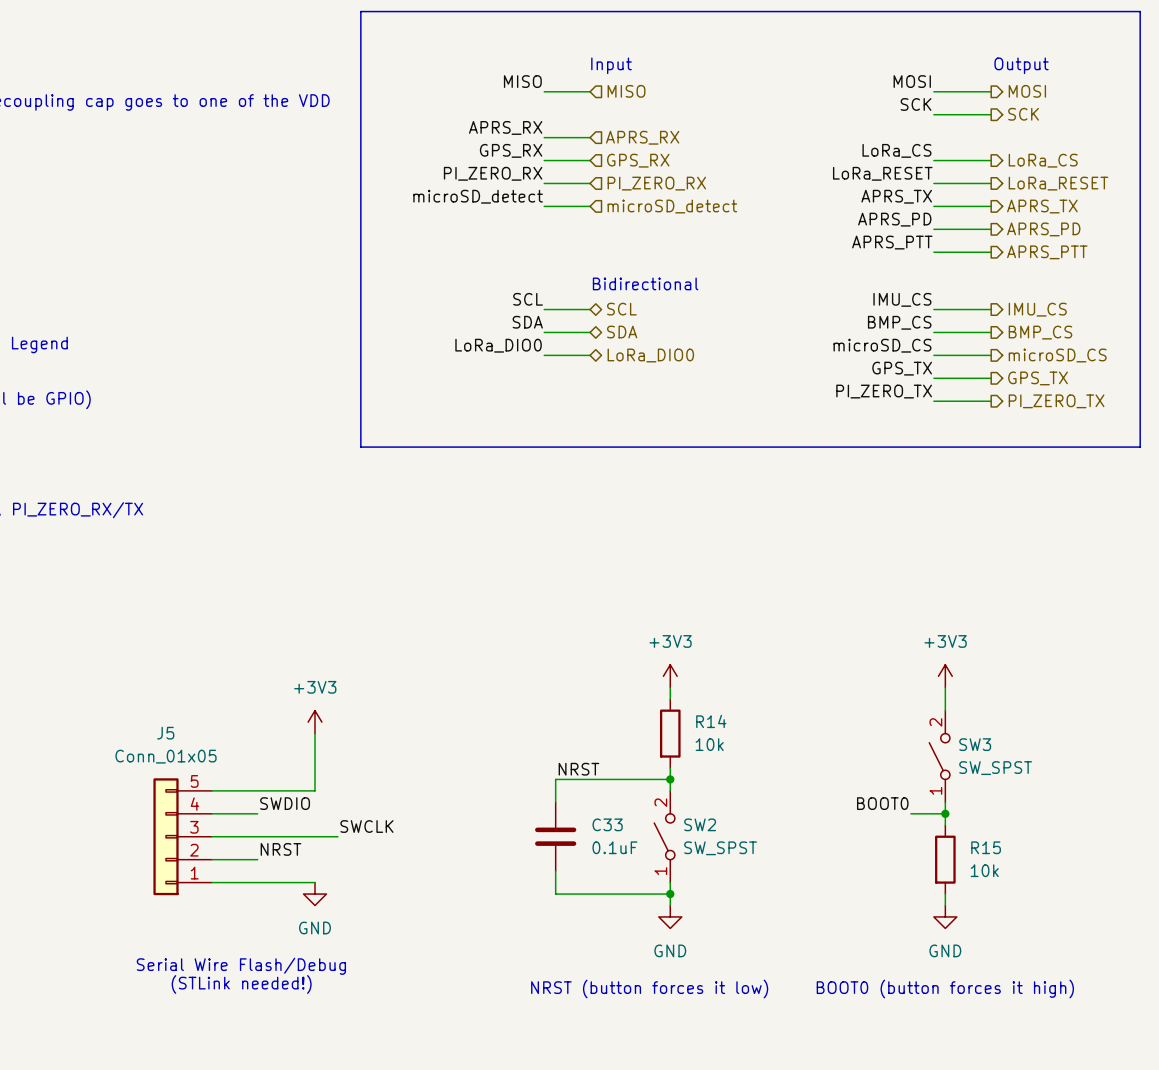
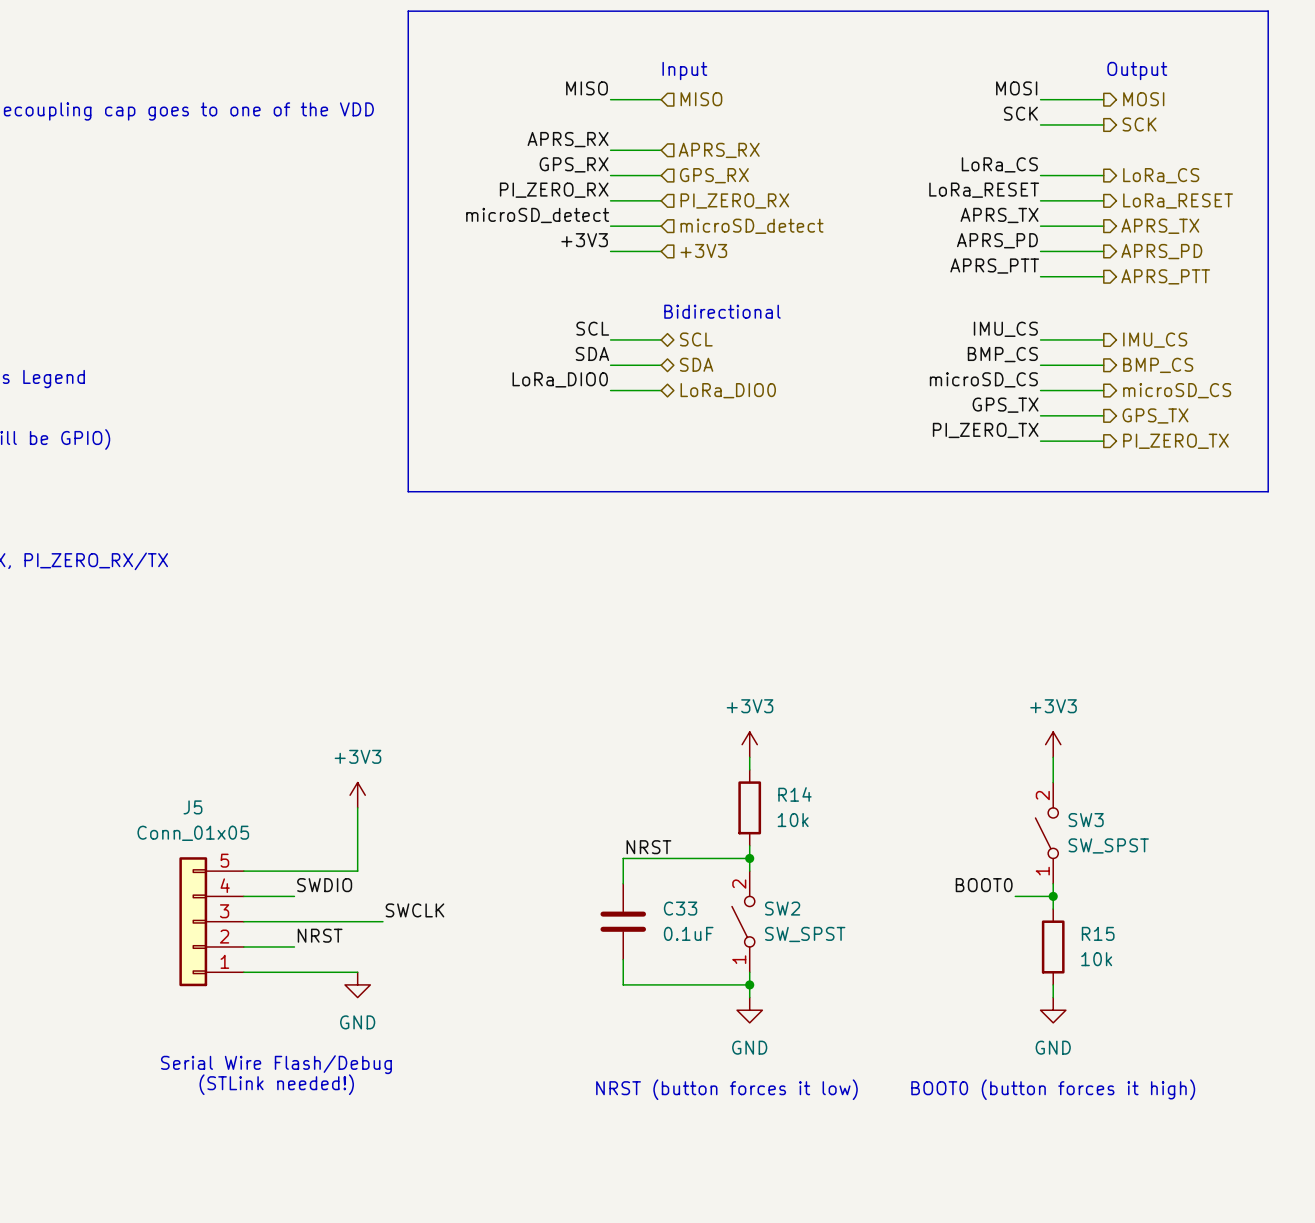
label: none -> +3V3 (584, 240)
hierarchical label: none -> +3V3 (703, 250)
wire: none -> (610, 251) (661, 251)

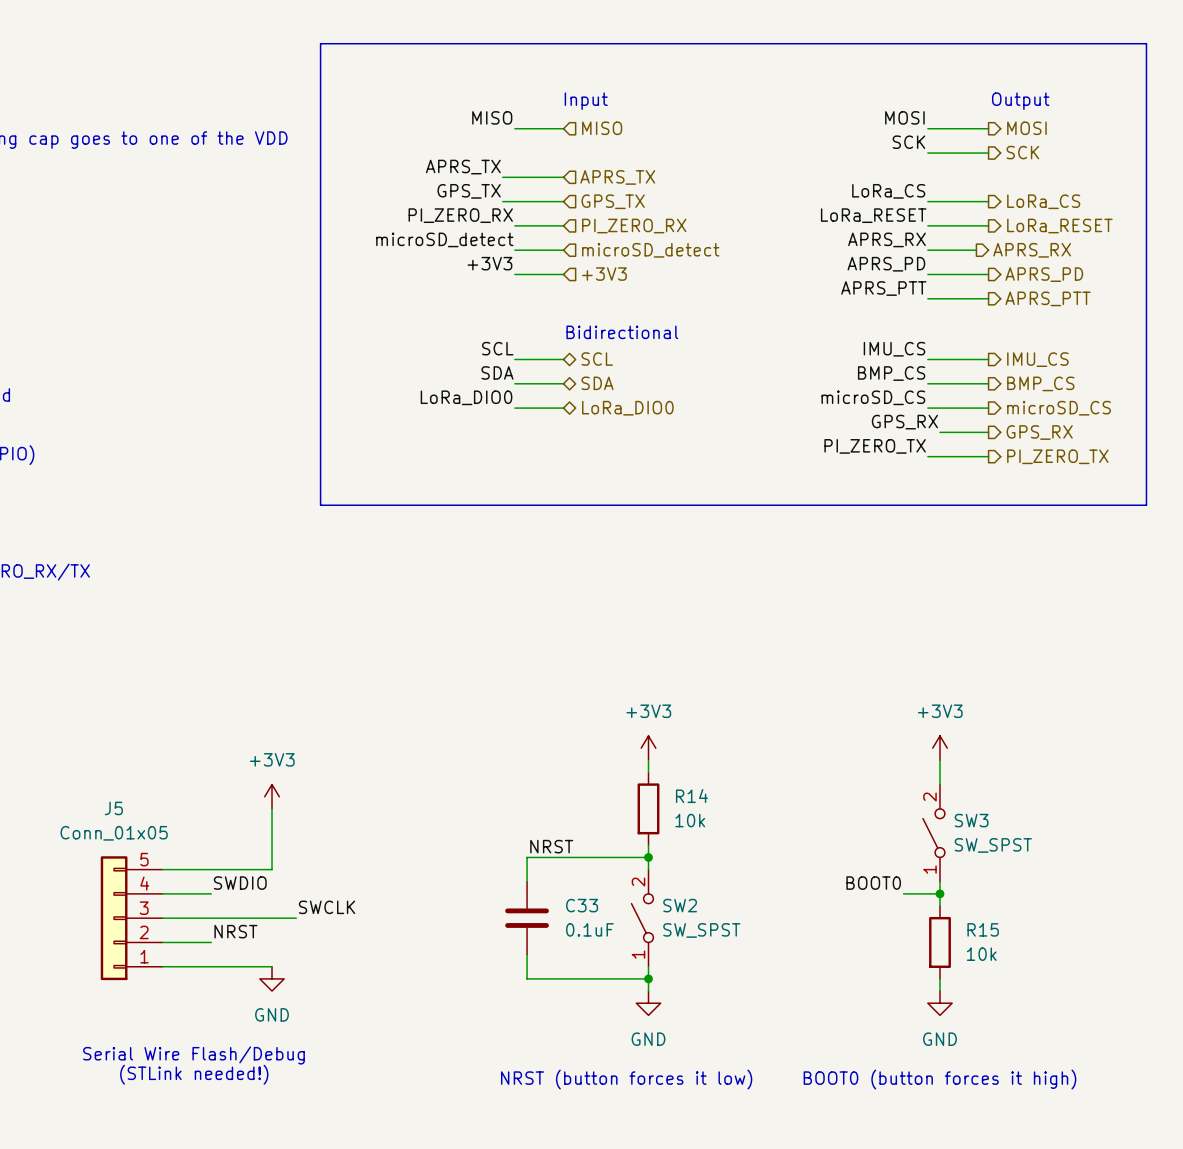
label: APRS_RX (568, 139) -> APRS_TX (463, 167)
wire: none -> (502, 177) (514, 177)
hierarchical label: APRS_RX (719, 150) -> APRS_TX (617, 177)
label: GPS_RX (574, 164) -> GPS_TX (469, 191)
wire: none -> (502, 201) (514, 201)
hierarchical label: GPS_RX (714, 175) -> GPS_TX (613, 201)
label: APRS_TX (999, 215) -> APRS_RX (886, 239)
wire: (1091, 226) (1103, 226) -> none
hierarchical label: APRS_TX (1160, 226) -> APRS_RX (1032, 250)
label: GPS_TX (1005, 405) -> GPS_RX (904, 422)
wire: (1040, 415) (1053, 415) -> none
hierarchical label: GPS_TX (1155, 415) -> GPS_RX (1039, 432)

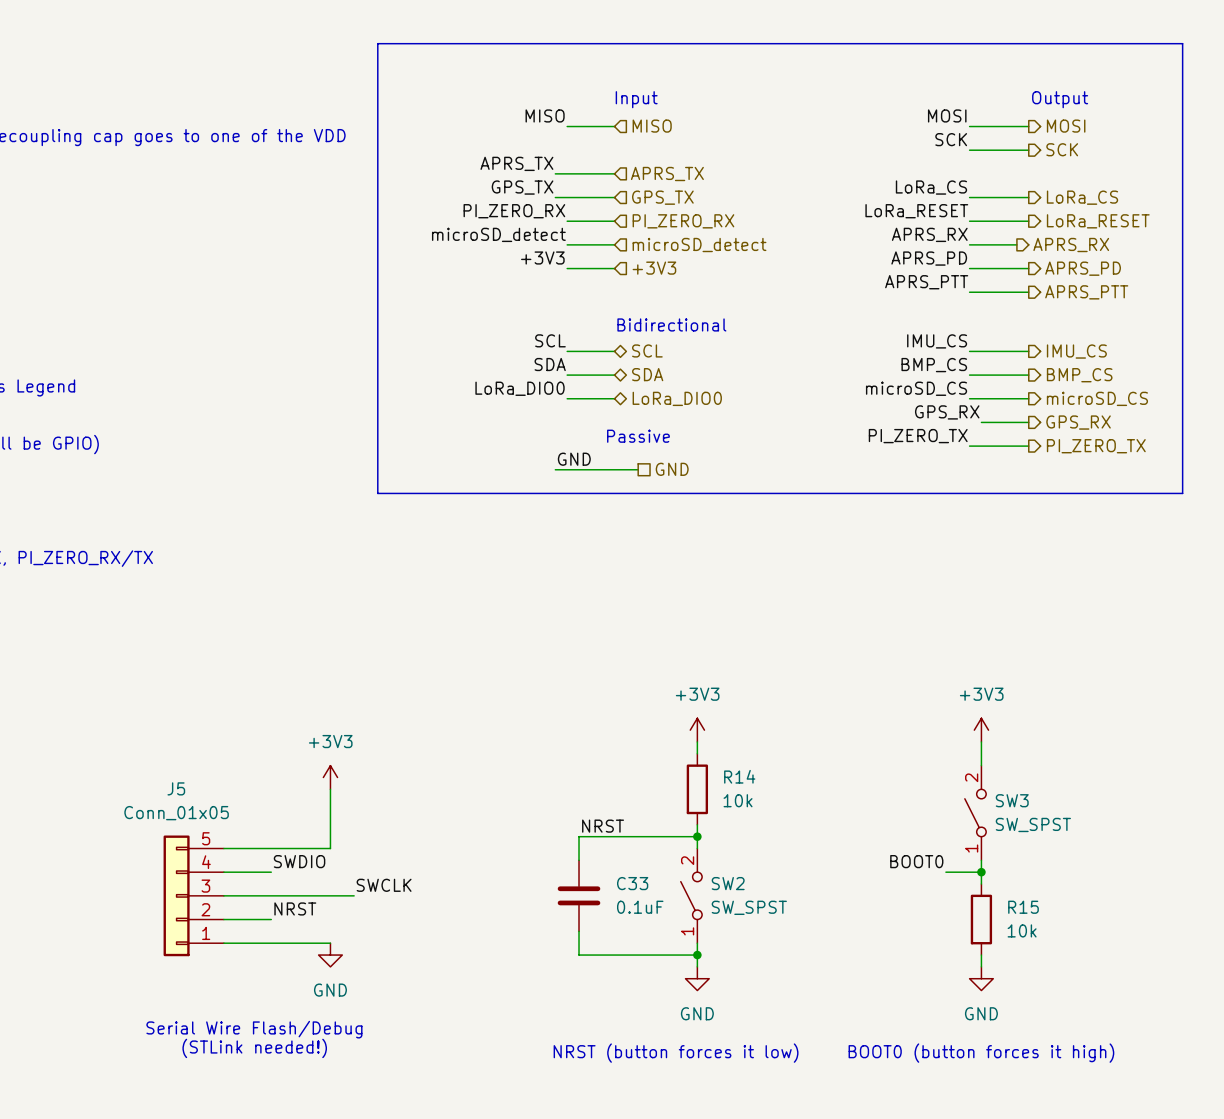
text: none -> Passive (638, 436)
label: none -> GND (574, 459)
wire: none -> (555, 469) (638, 469)
hierarchical label: none -> GND (672, 469)

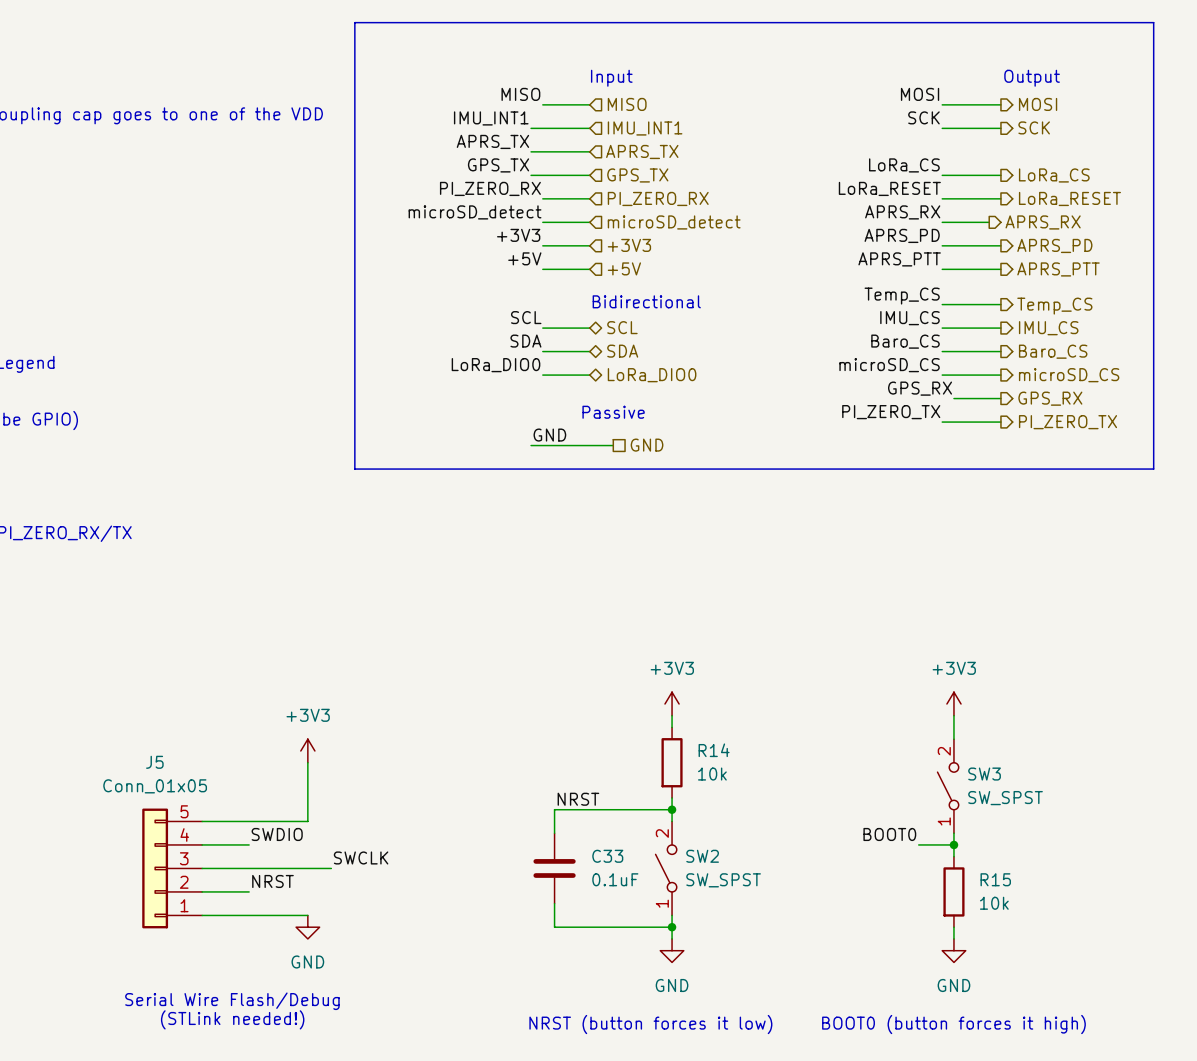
label: none -> IMU_INT1 (491, 118)
wire: none -> (531, 128) (589, 128)
hierarchical label: none -> IMU_INT1 (645, 128)
label: none -> +5V (524, 258)
hierarchical label: none -> +5V (624, 268)
wire: none -> (542, 269) (589, 269)
label: none -> Temp_CS (902, 296)
wire: none -> (942, 304) (1000, 304)
hierarchical label: none -> Temp_CS (1054, 306)
label: BMP_CS (934, 365) -> Baro_CS (905, 341)
hierarchical label: BMP_CS (1079, 375) -> Baro_CS (1053, 351)

